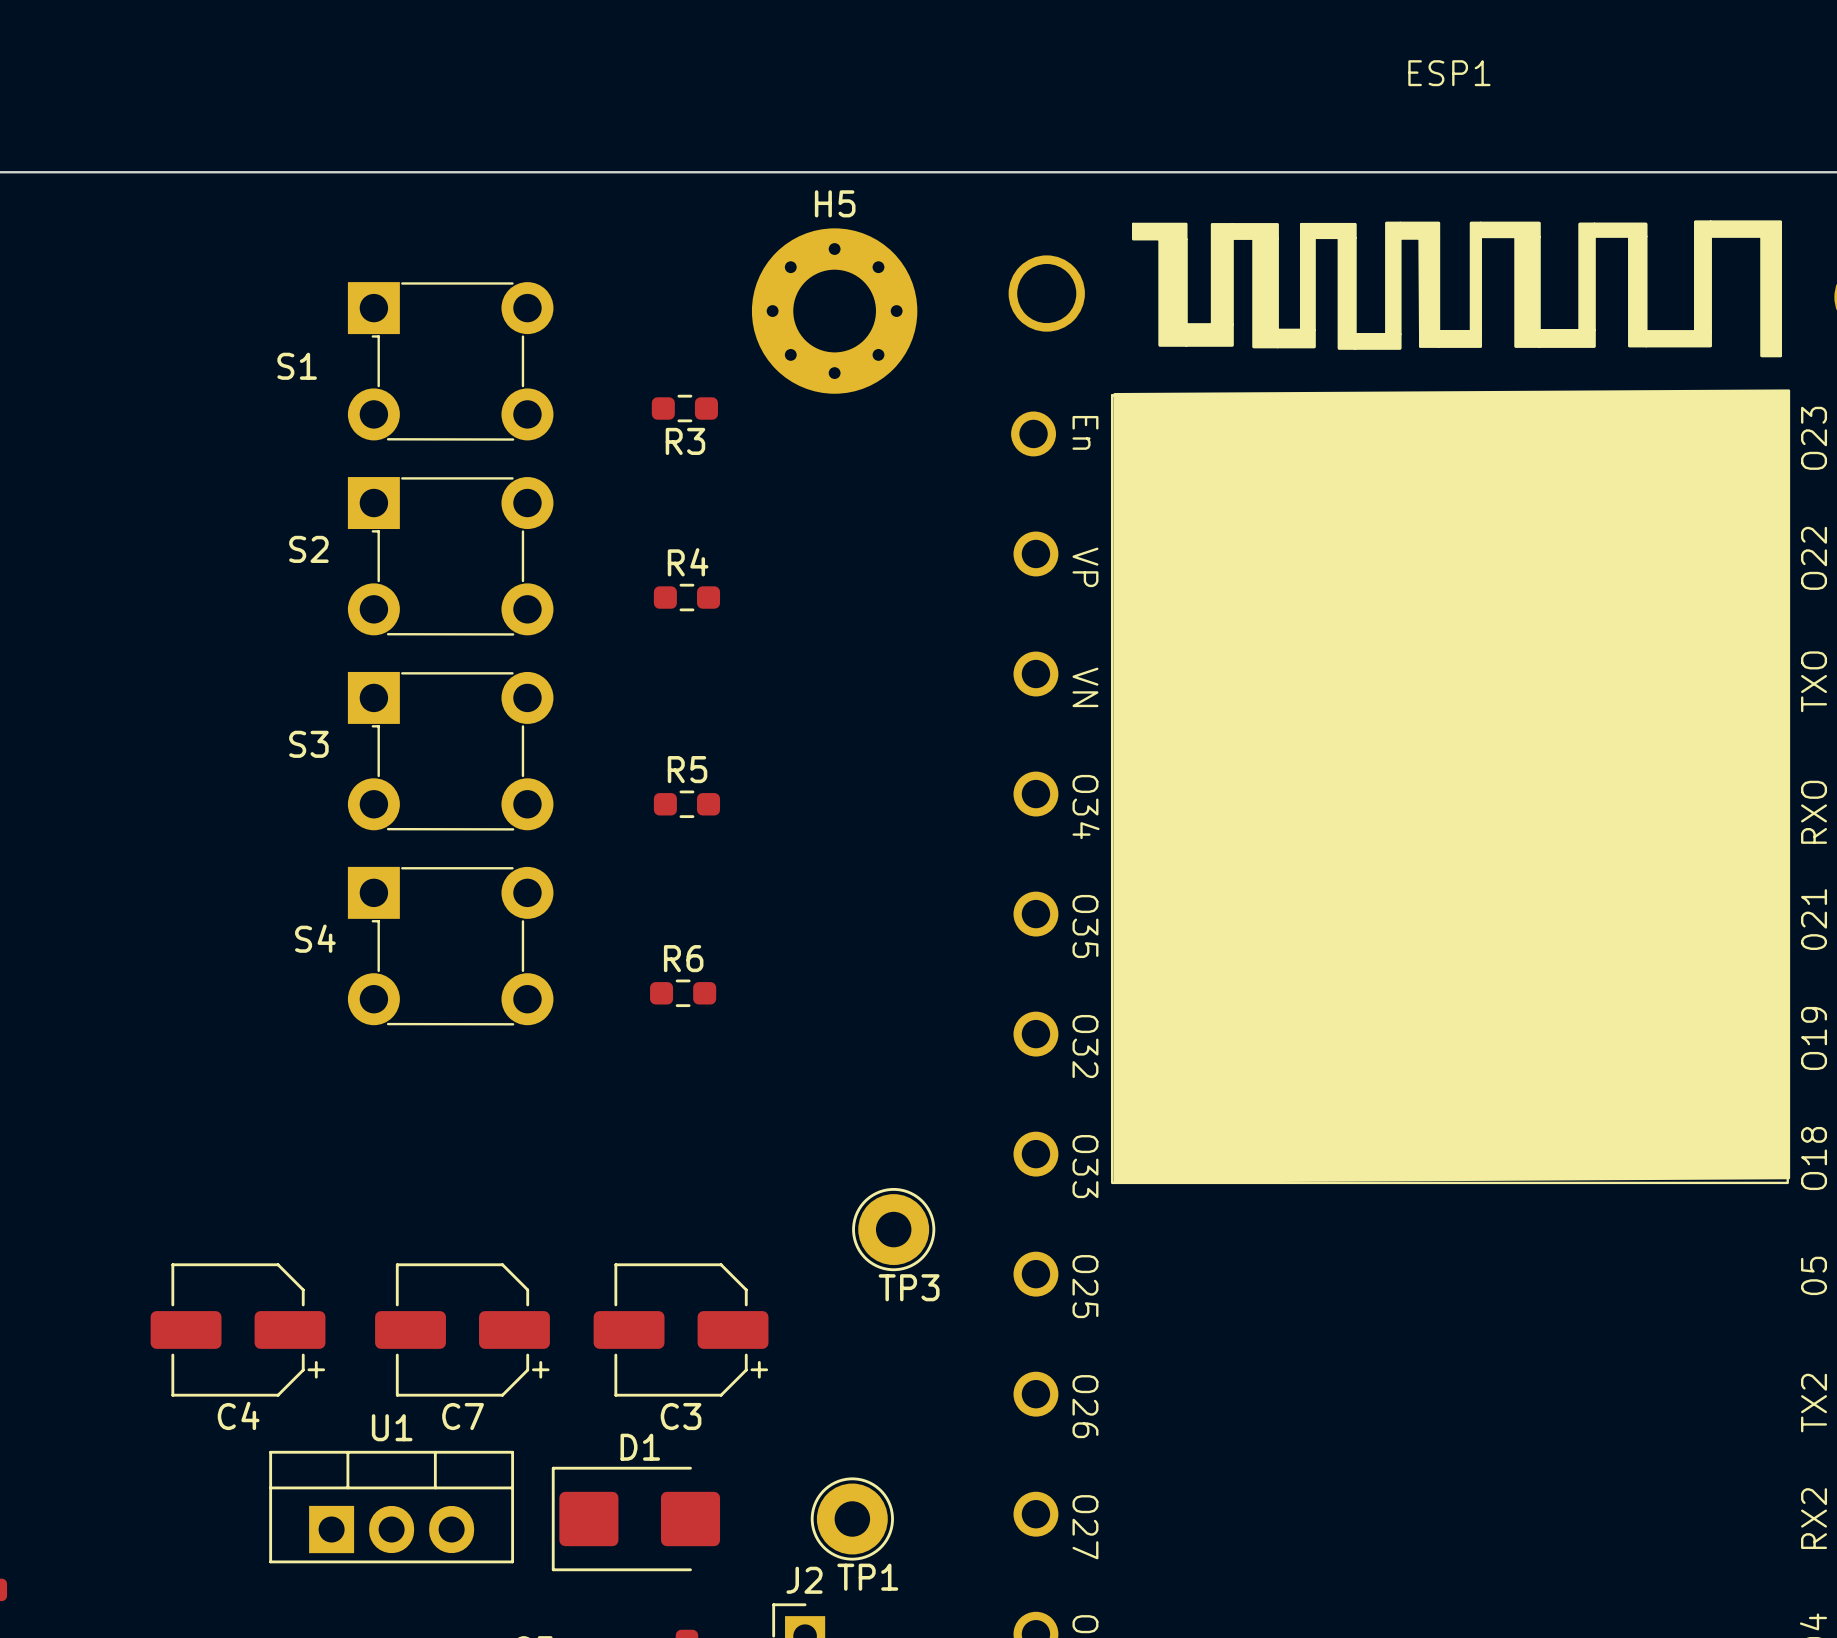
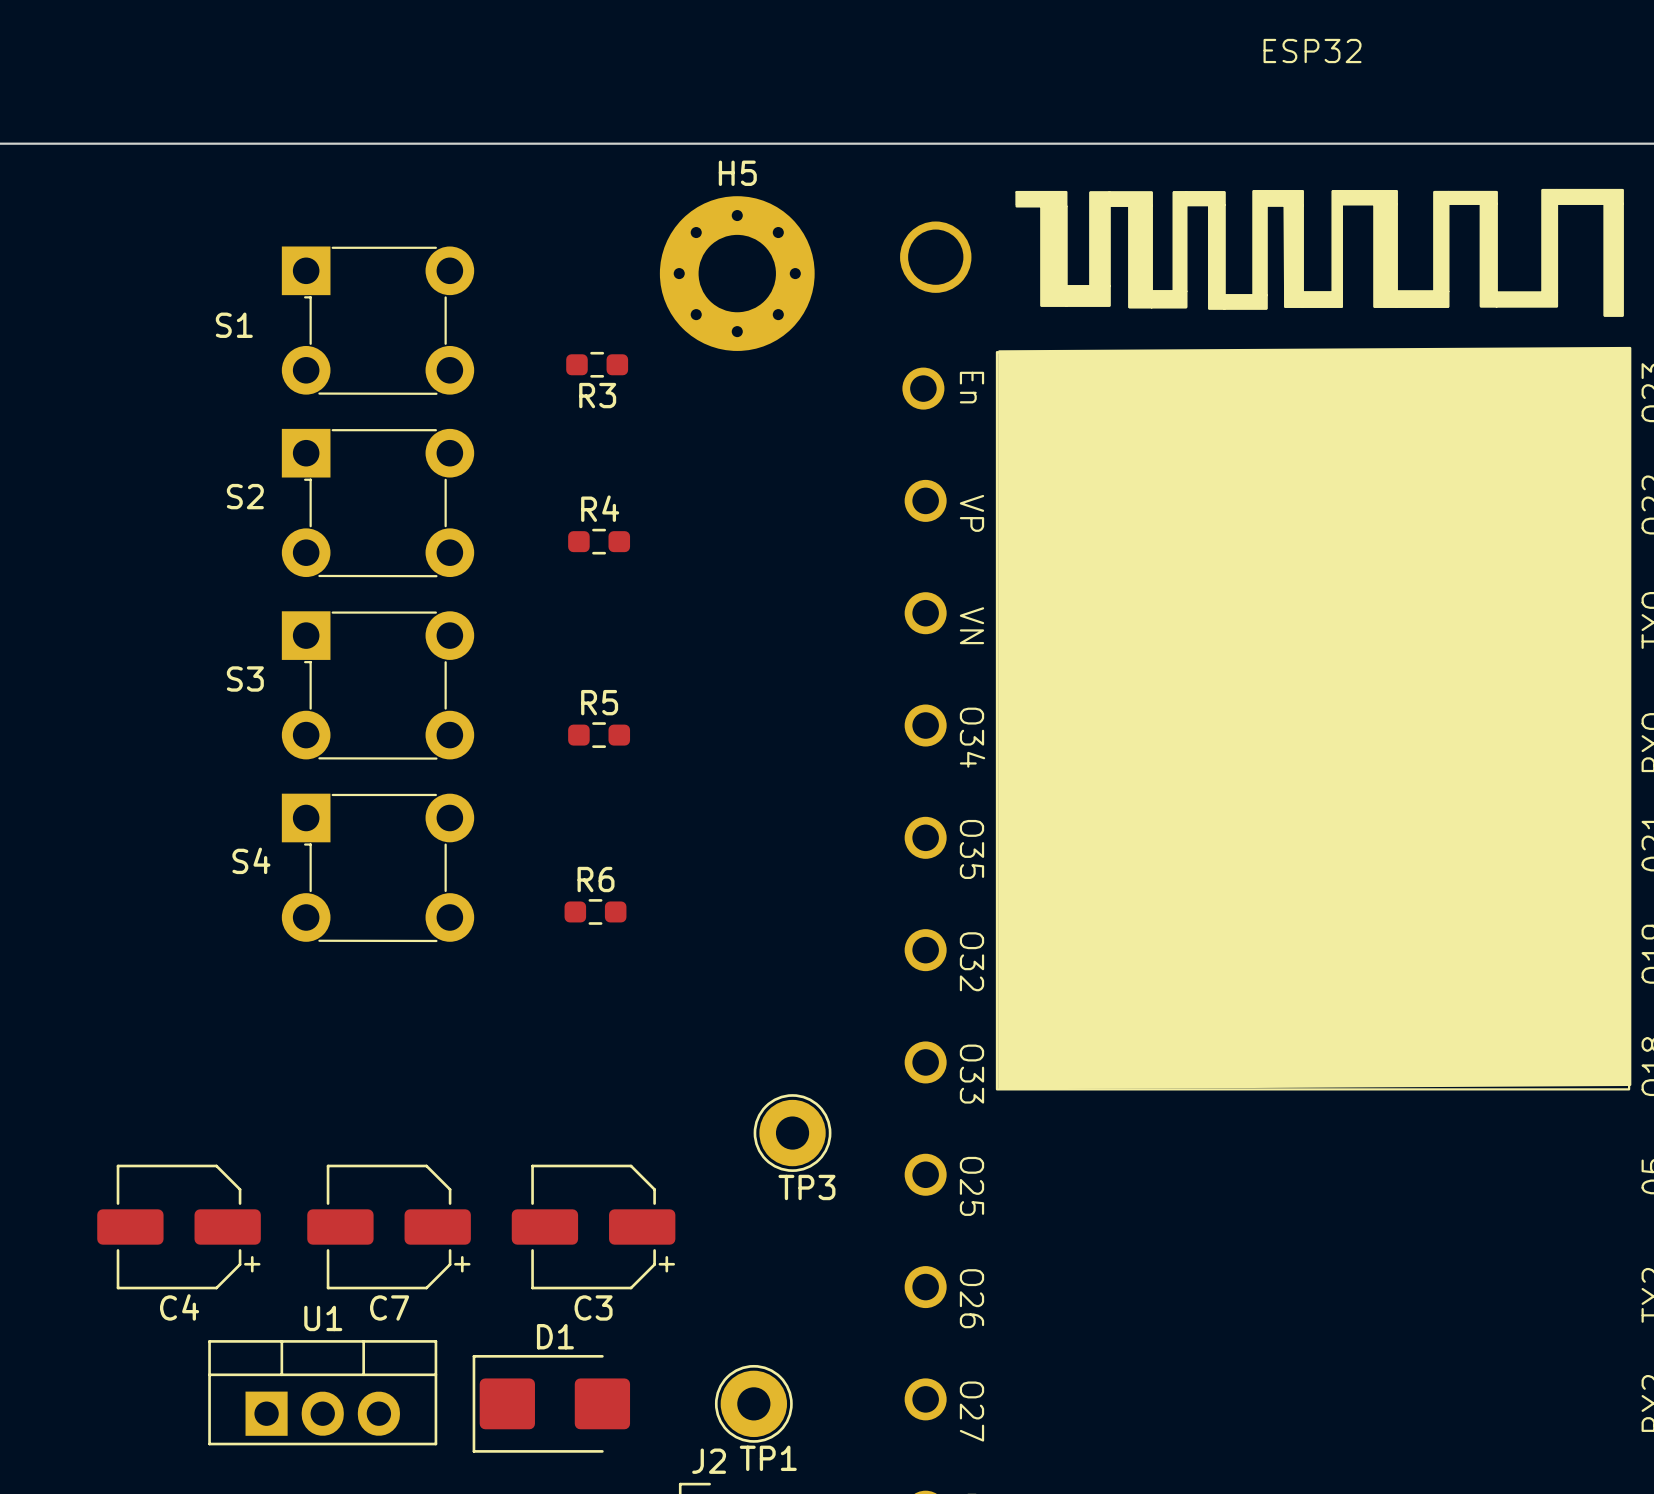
ESP1 name: ESP1 (1449, 73) -> ESP32 (1312, 51)

